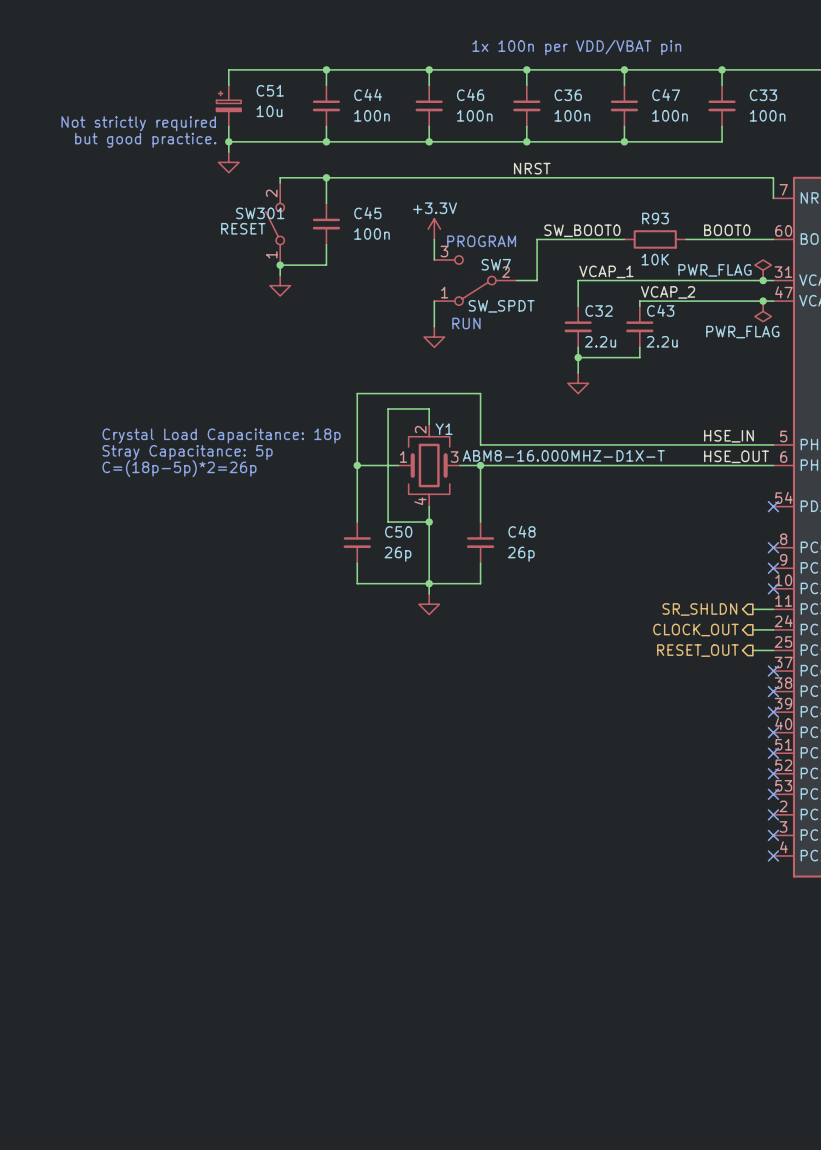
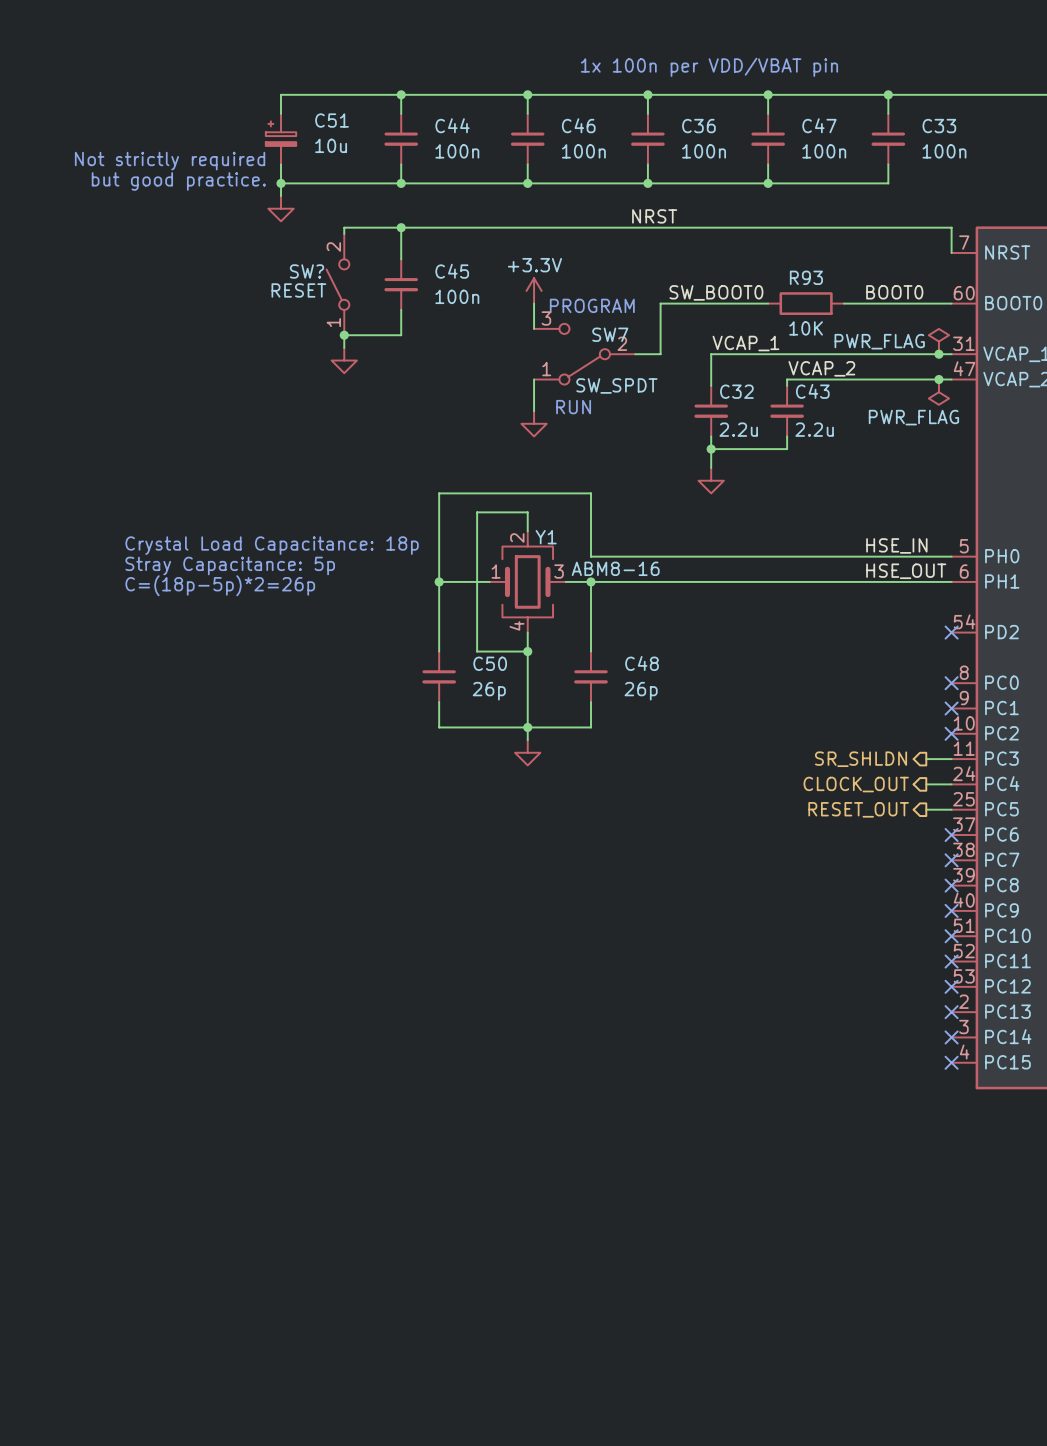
SW301 name: SW301 (260, 213) -> SW? (307, 271)
Y1 value: ABM8-16.000MHZ-D1X-T (563, 455) -> ABM8-16 (615, 568)

